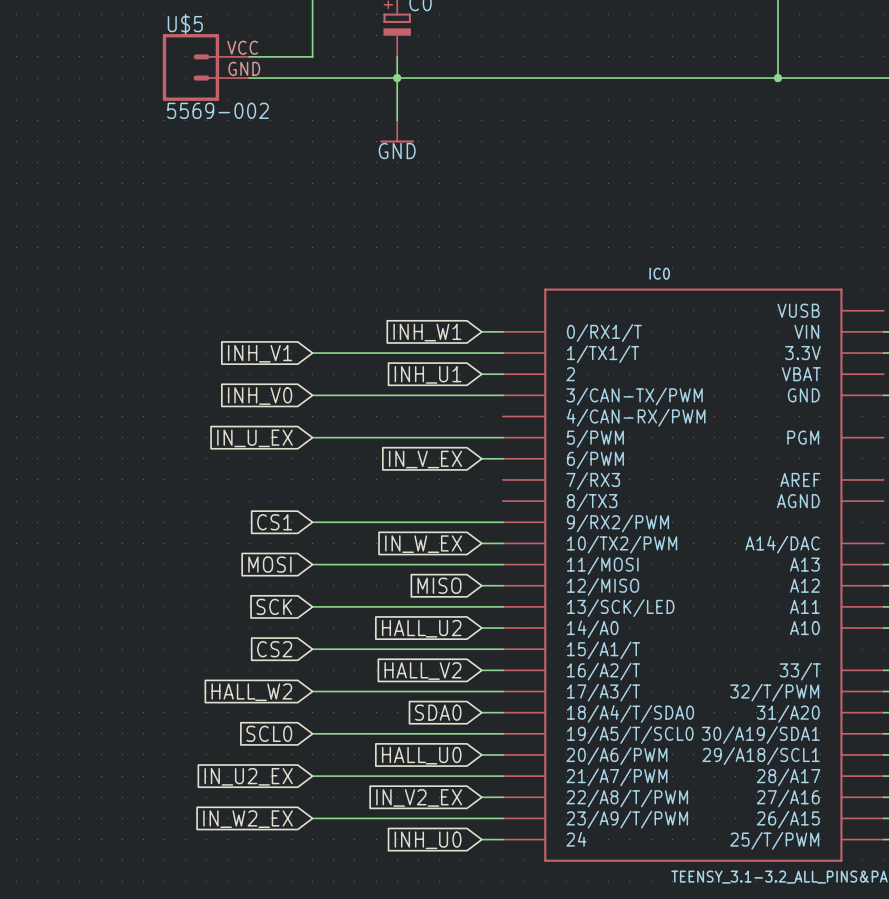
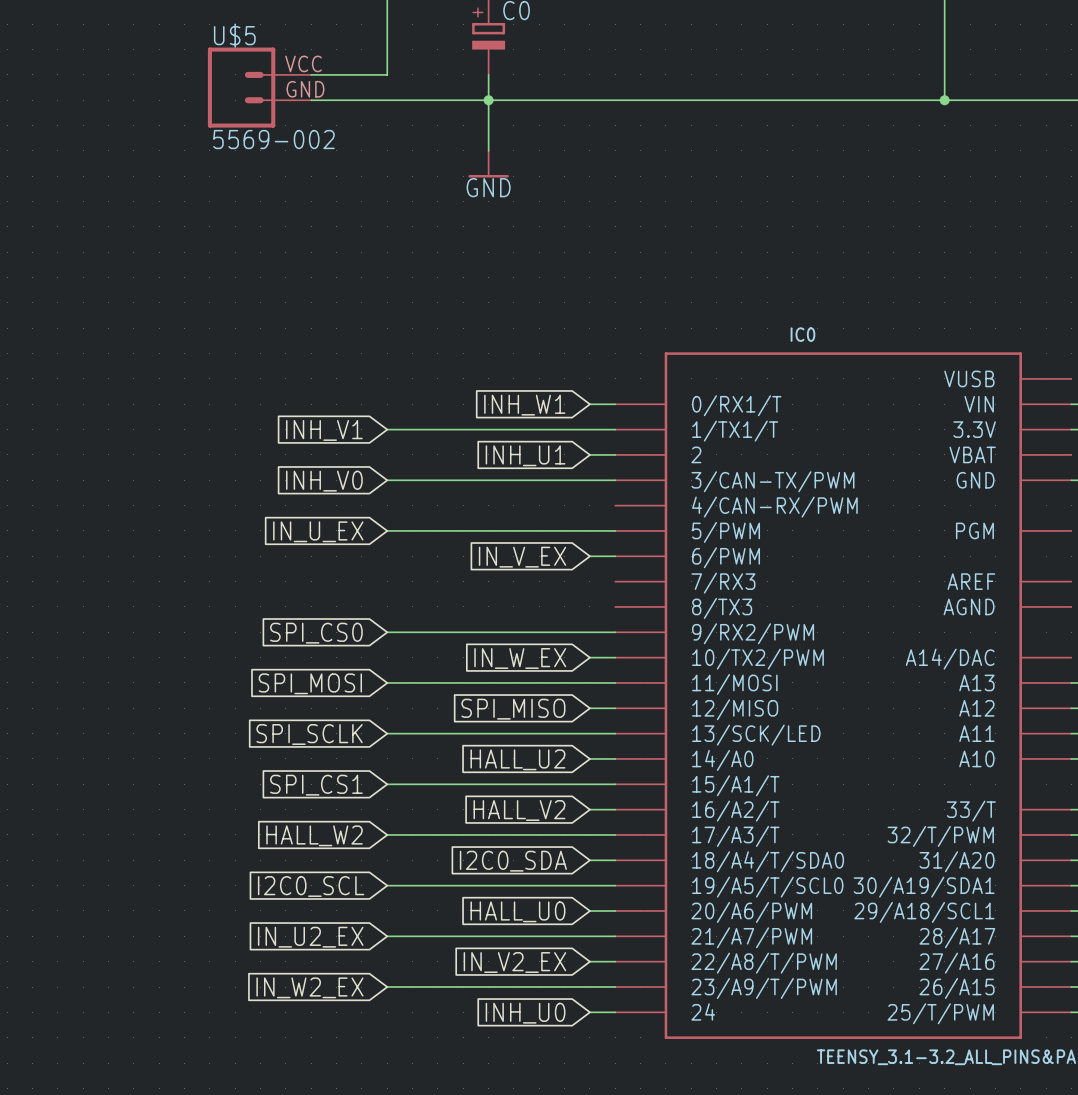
global label: CS1 (274, 522) -> SPI_CS0 (316, 633)
global label: MOSI (269, 564) -> SPI_MOSI (310, 683)
global label: MISO (439, 585) -> SPI_MISO (513, 709)
global label: SCK (274, 606) -> SPI_SCLK (309, 734)
global label: CS2 (274, 649) -> SPI_CS1 (316, 785)
global label: SDA0 (438, 712) -> I2C0_SDA (513, 861)
global label: SCL0 (269, 733) -> I2C0_SCL (311, 886)

